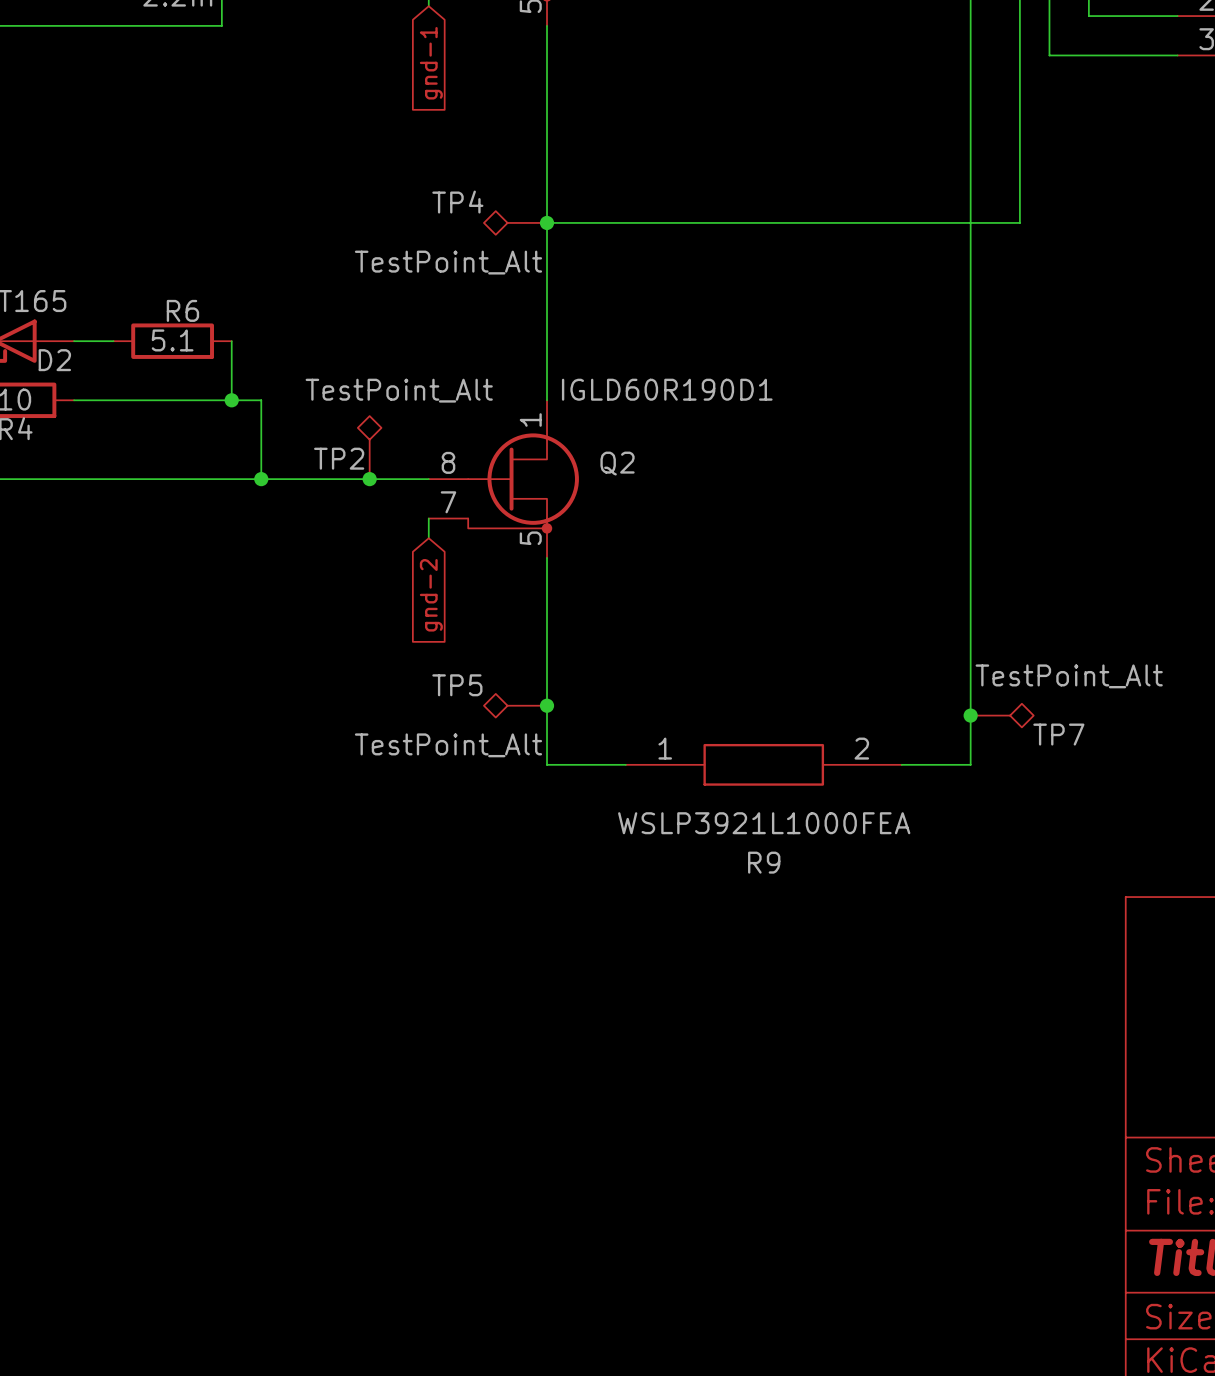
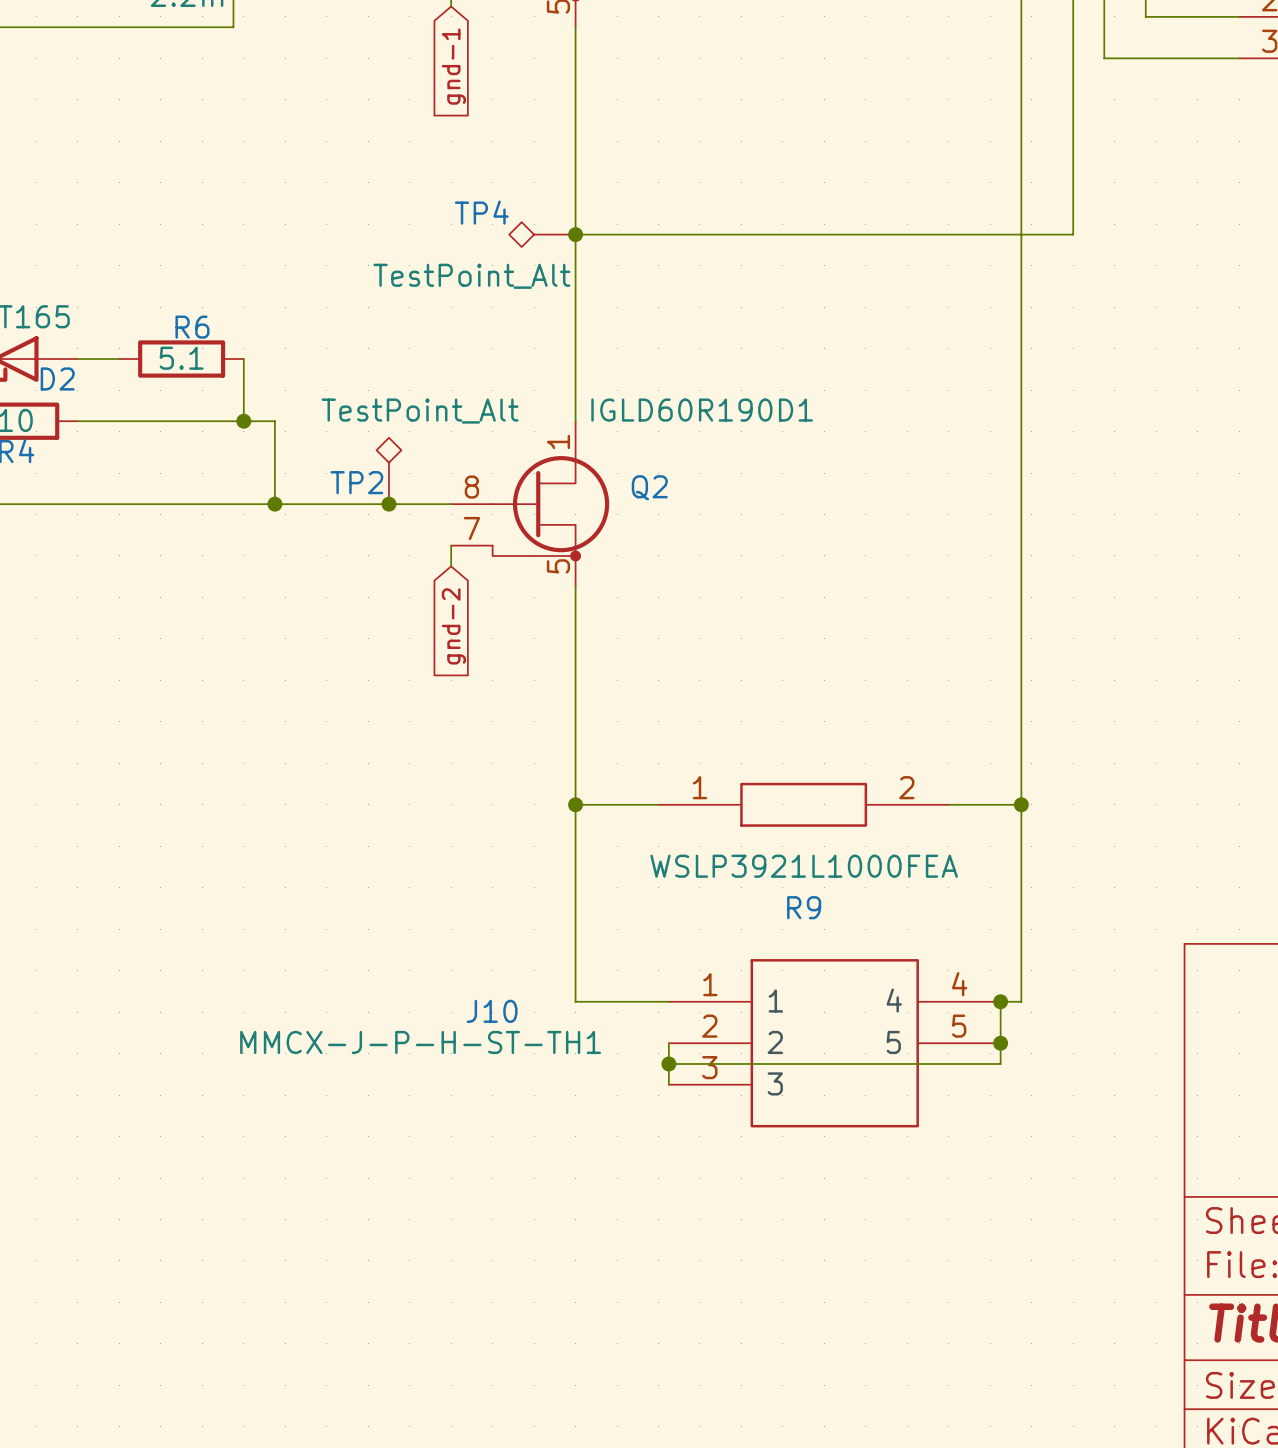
TP5: TestPoint_Alt (515, 705) -> none
junction position: (547, 705) -> (575, 804)
junction position: (970, 715) -> (1021, 804)
TP7: TestPoint_Alt (1002, 715) -> none
wire: none -> (575, 804) (575, 1001) (668, 1001)
wire: none -> (1021, 804) (1021, 1001) (1000, 1001) (1000, 1063) (668, 1063)
junction: none -> (1000, 1001)
wire: none -> (668, 1043) (668, 1084)
J10: none -> MMCX-J-P-H-ST-TH1 (834, 1043)
junction: none -> (1000, 1043)
junction: none -> (668, 1063)

